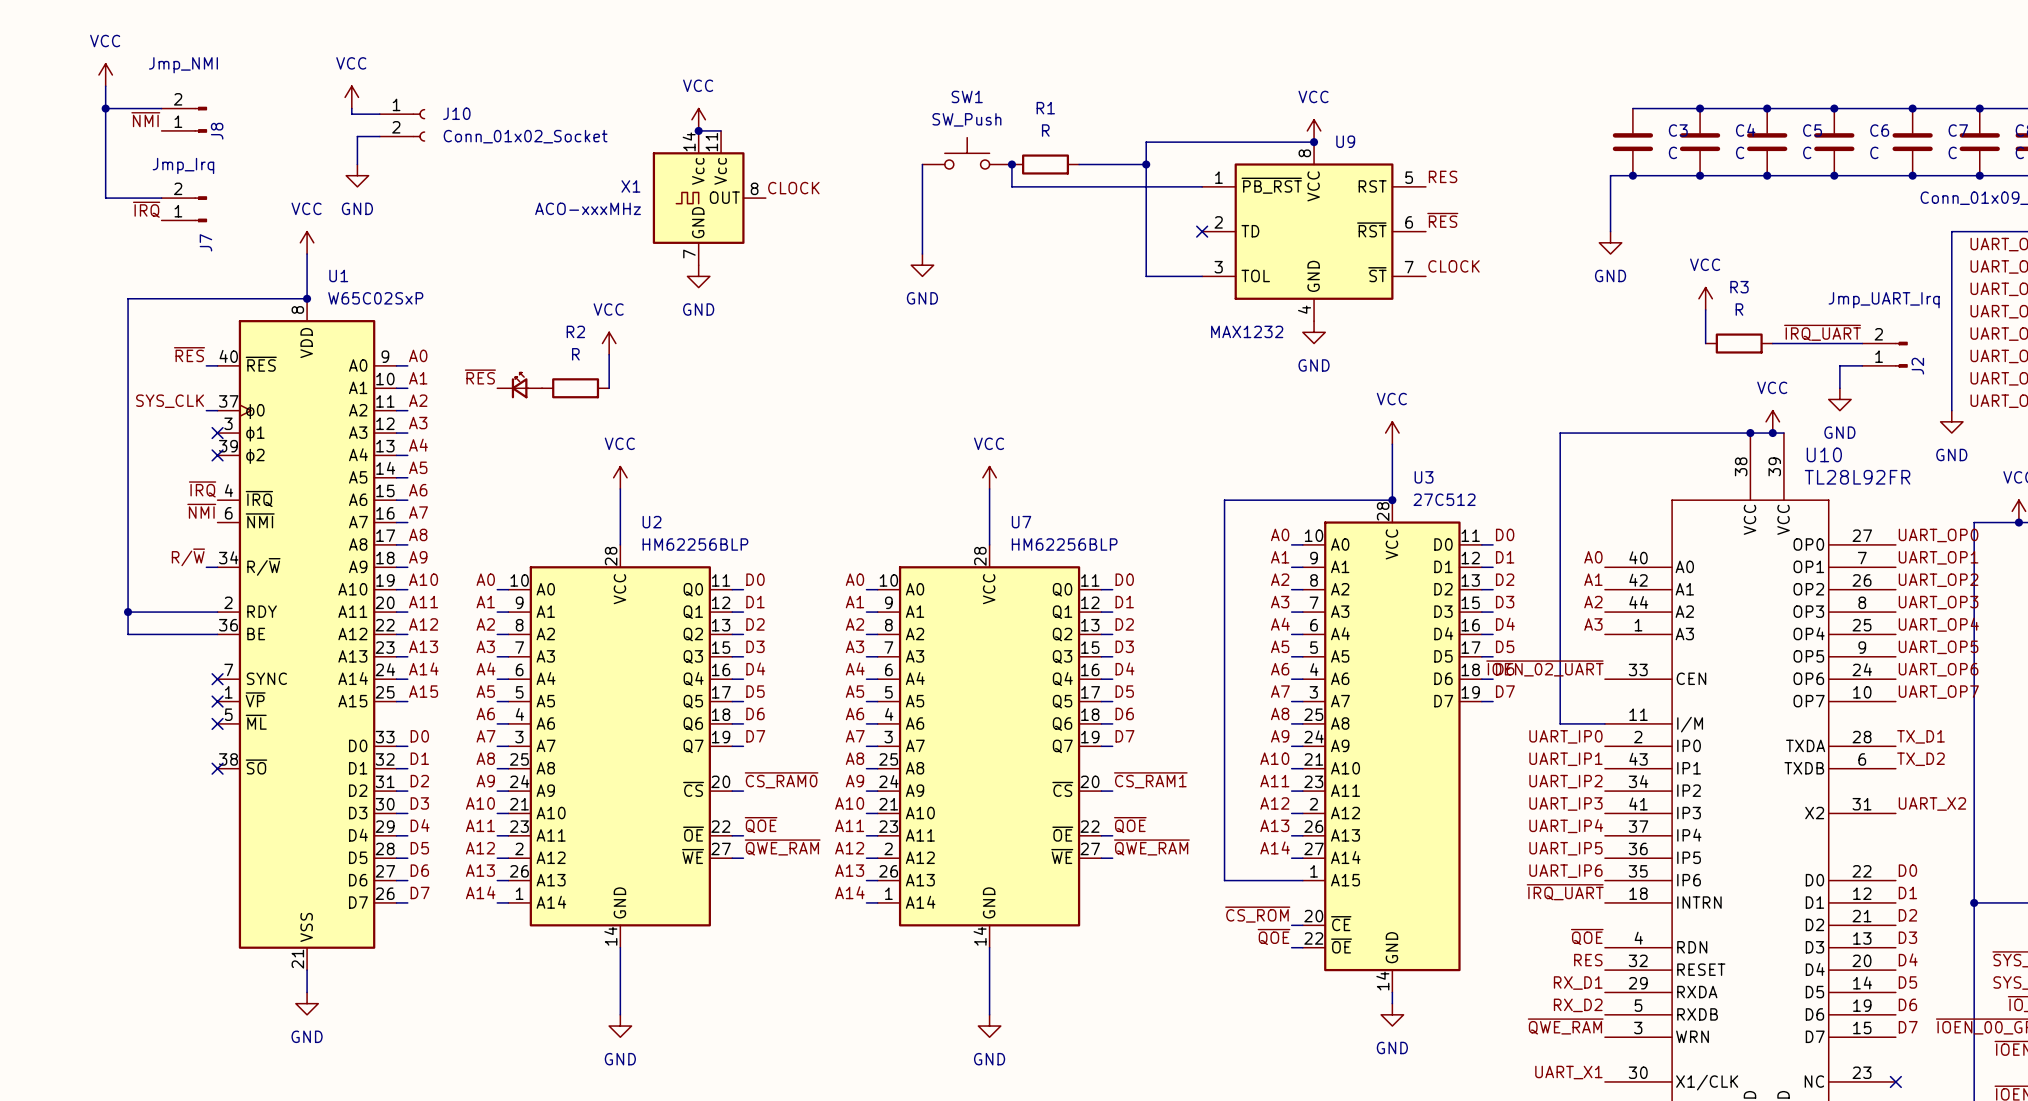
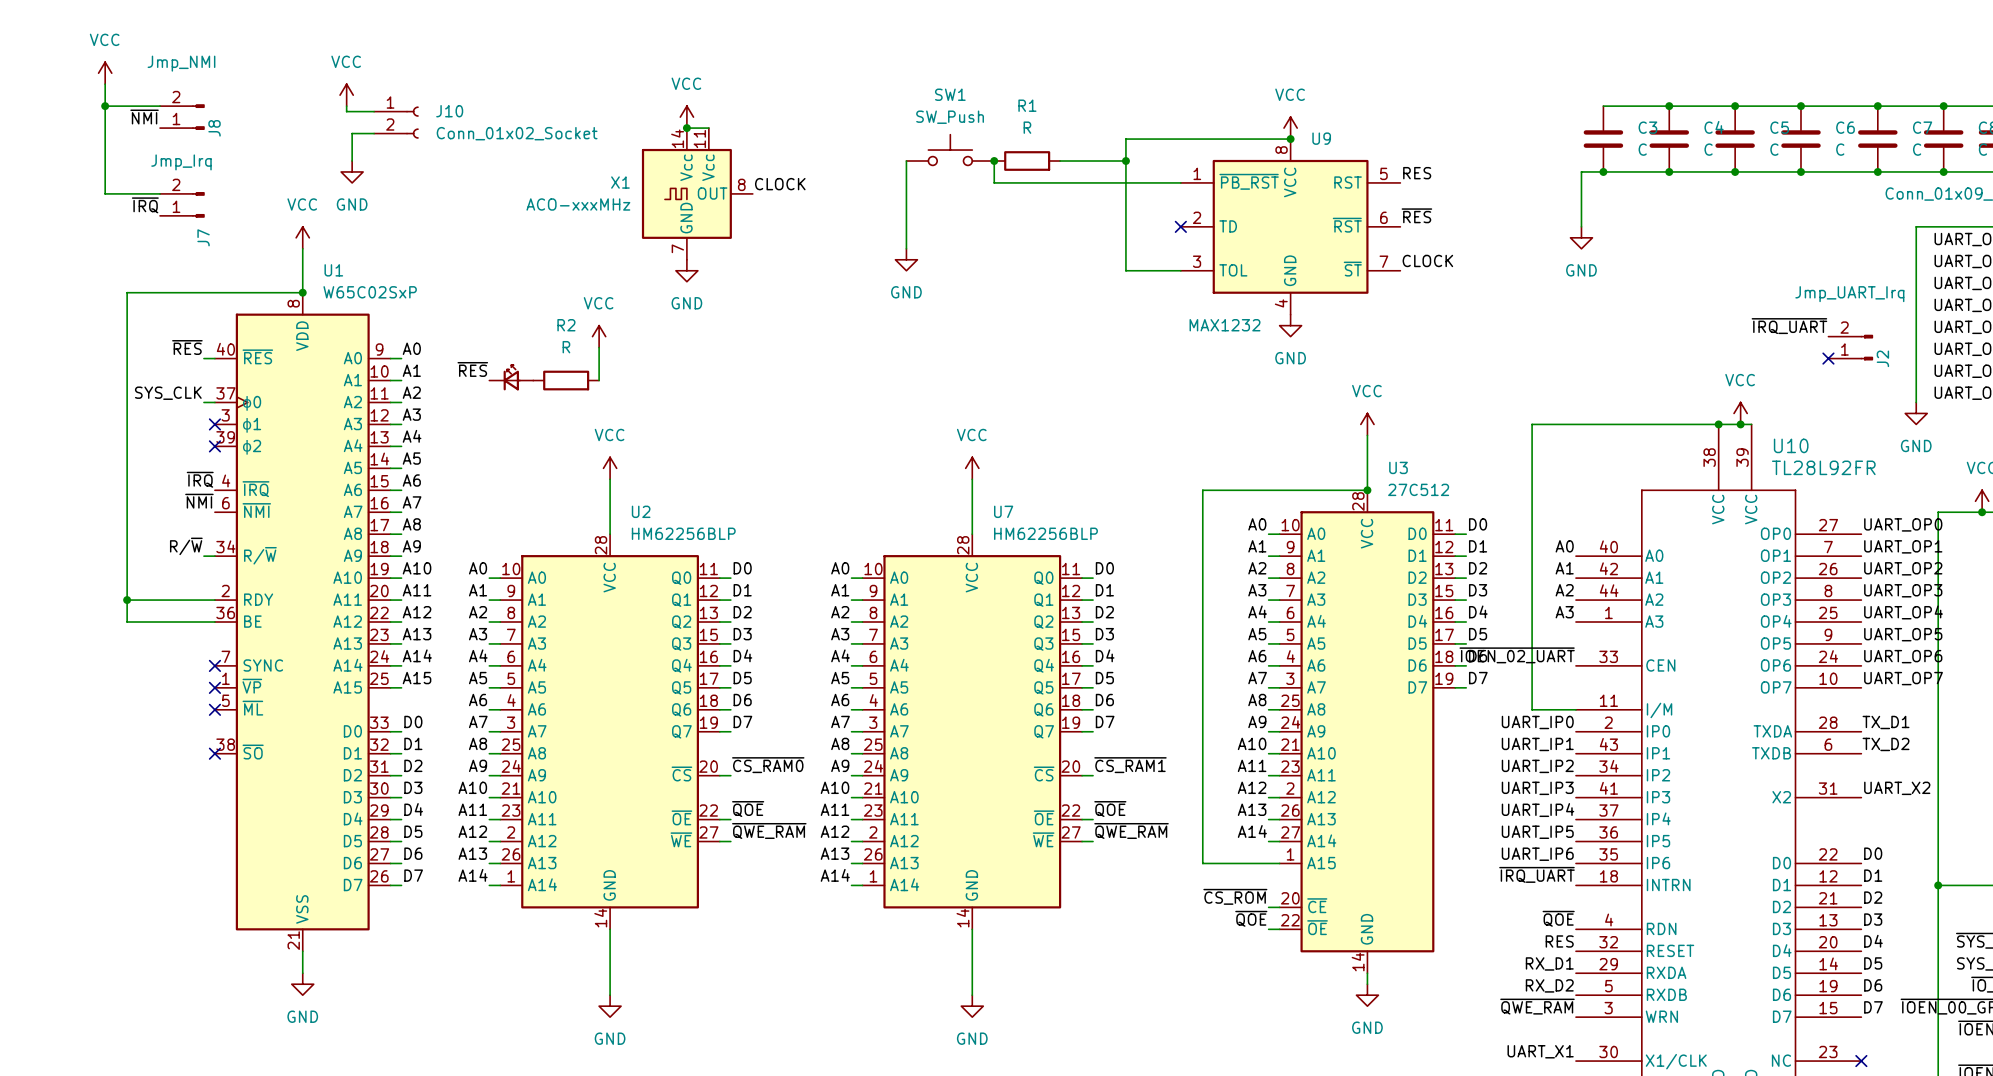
power symbol: VCC (1705, 298) -> none
wire: (1705, 309) (1705, 343) -> none
R3: R (1739, 343) -> none
wire: (1772, 343) (1862, 343) -> none
wire: (1862, 365) (1839, 365) (1839, 388) -> none
no-connect mark: none -> (1828, 358)
power symbol: GND (1839, 399) -> none

